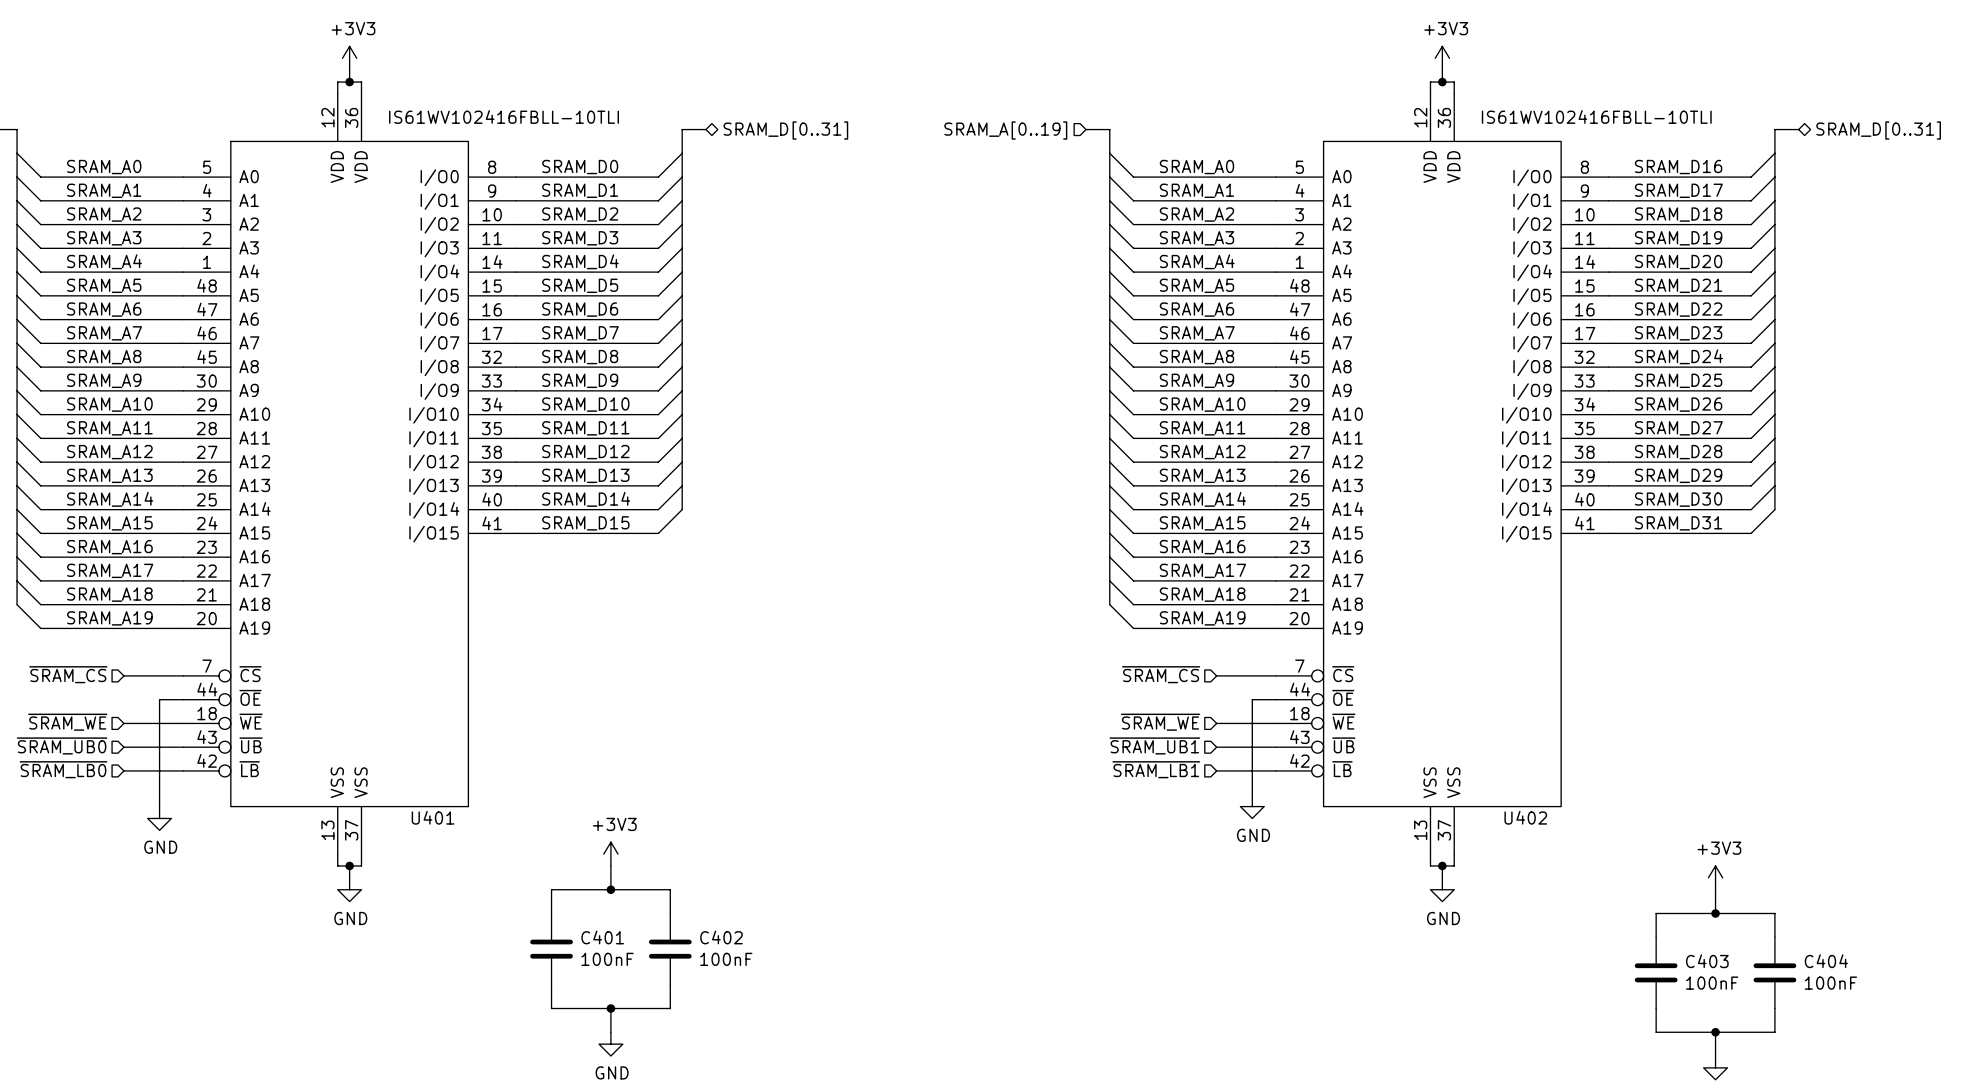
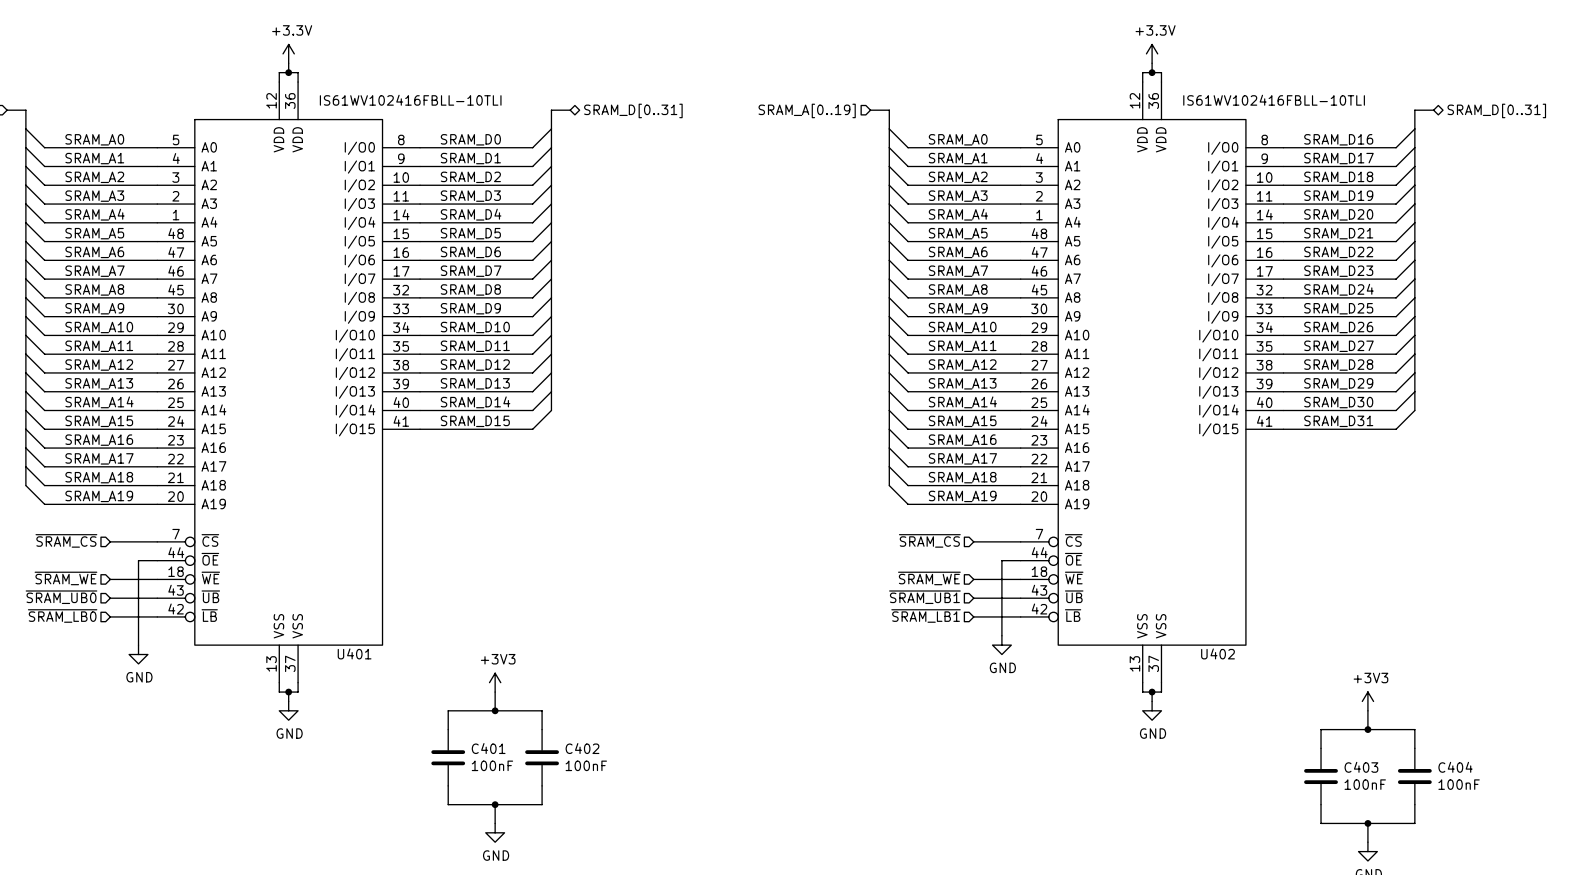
power symbol: +3V3 (349, 58) -> +3.3V (288, 53)
power symbol: +3V3 (1442, 58) -> +3.3V (1152, 53)

